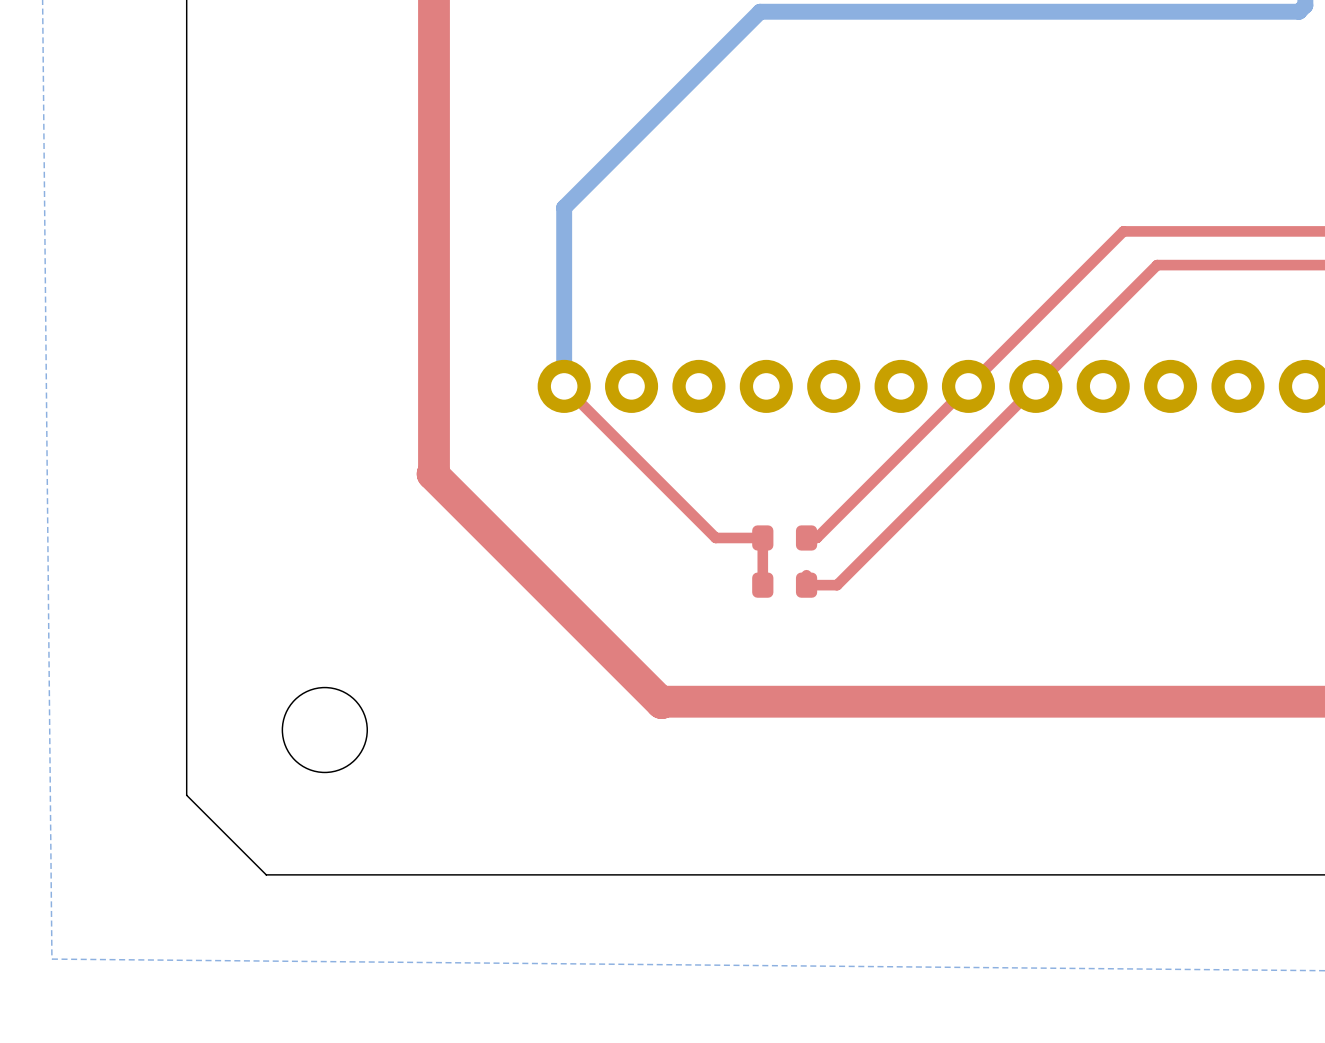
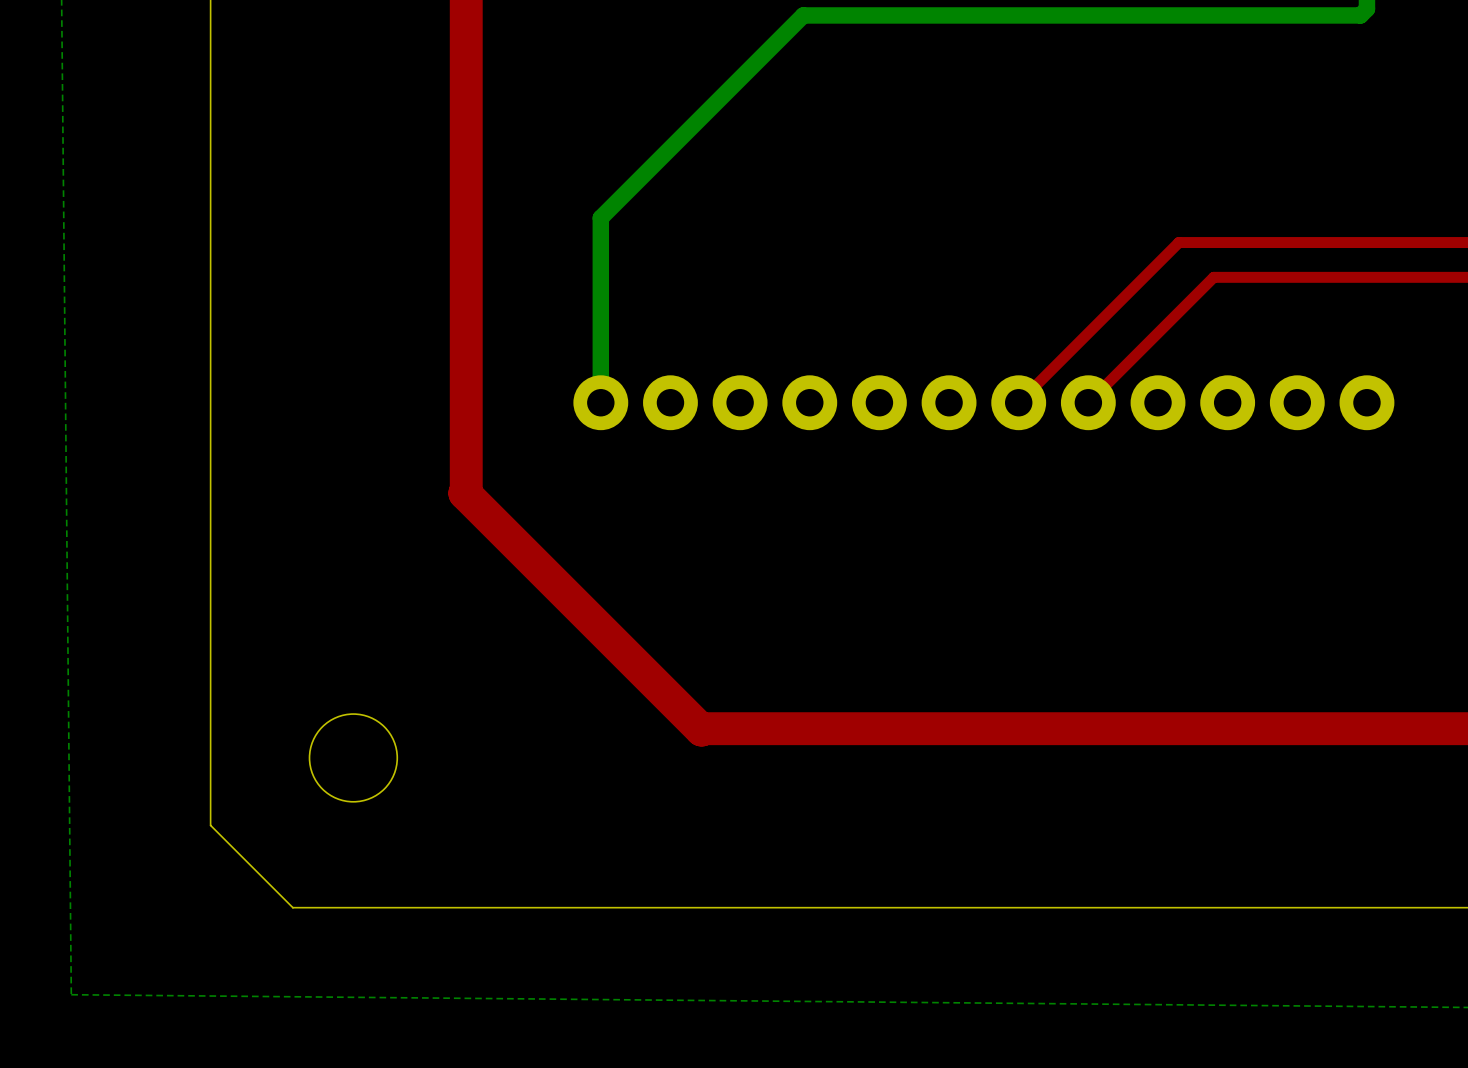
top track: (564, 386) (715, 537) (762, 537) (762, 585) -> none
top track: (968, 386) (816, 537) (806, 537) -> none
top track: (1035, 386) (837, 585) (806, 585) (806, 575) -> none
part: (784, 537) -> none
part: (784, 585) -> none

